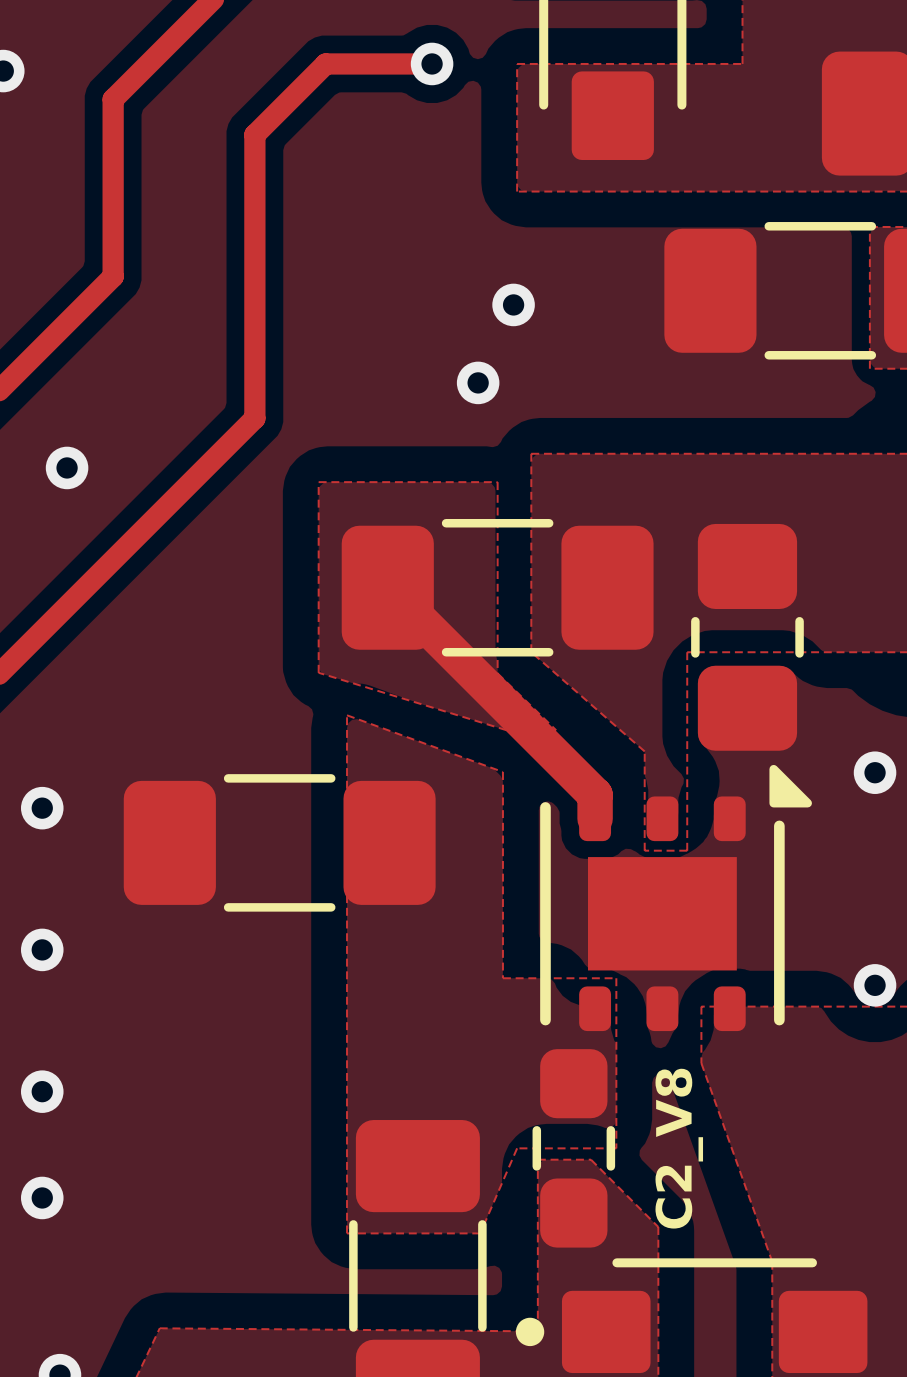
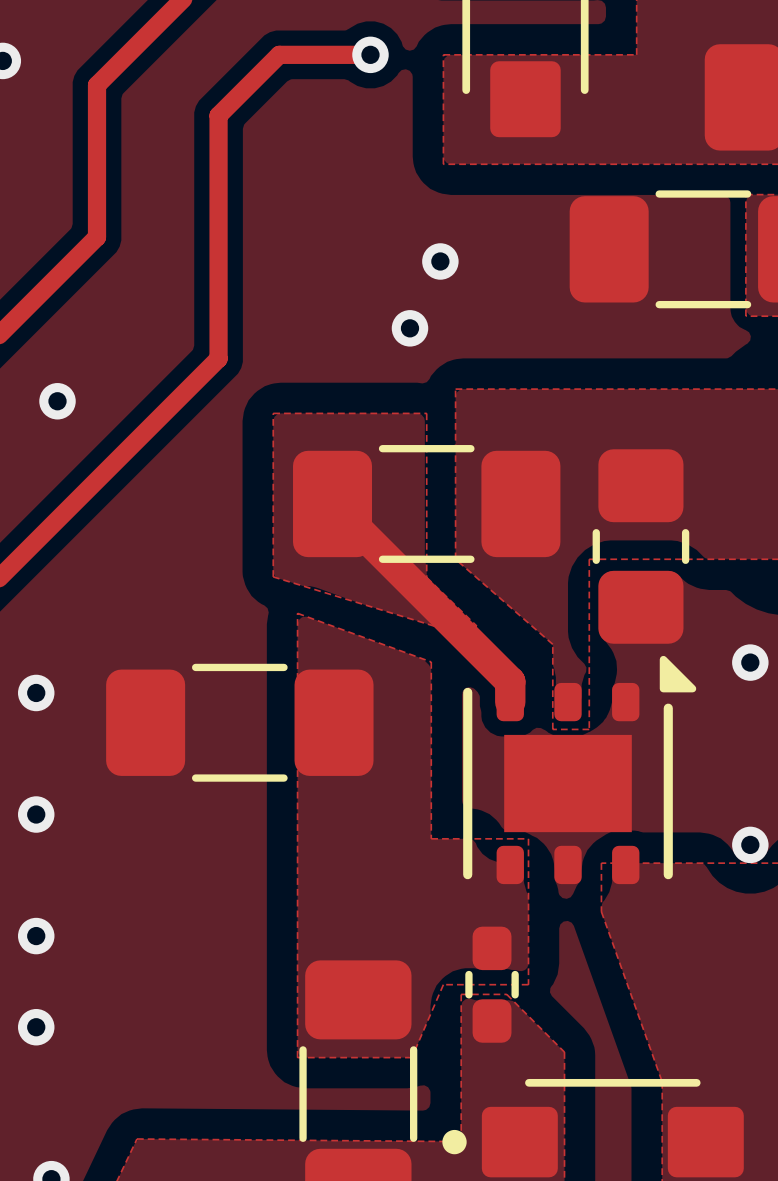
C2_V8: (573, 1148) -> none
part: none -> (492, 984)

